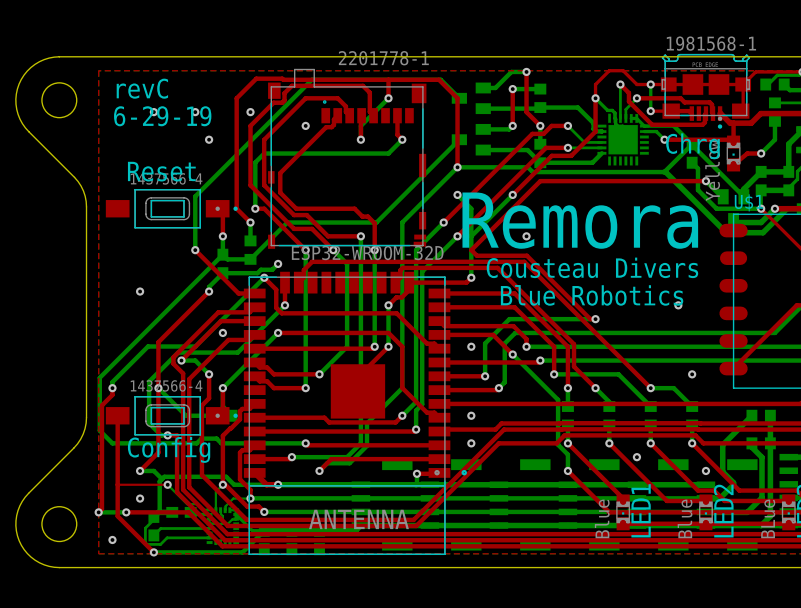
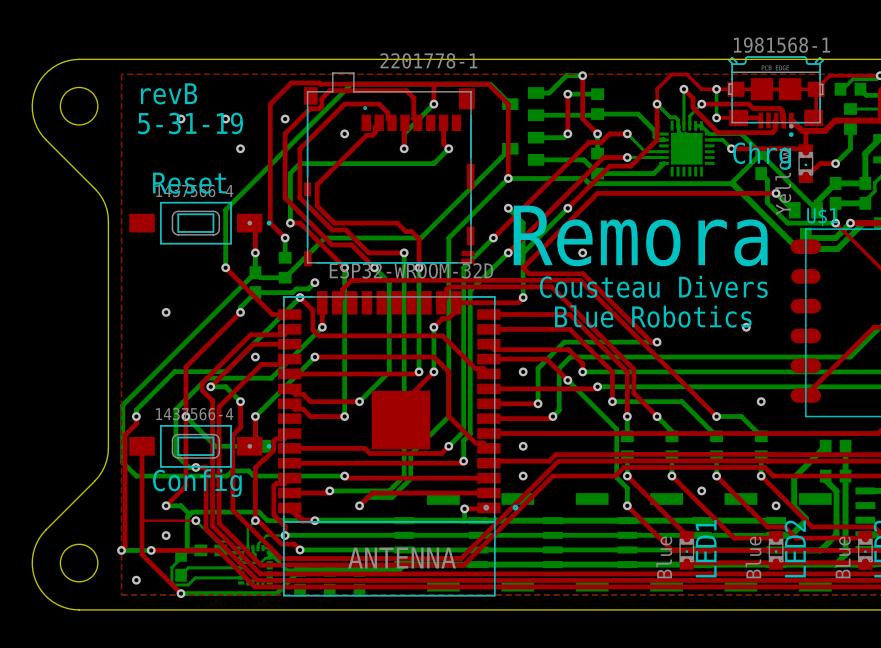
text: revC (142, 88) -> revB (169, 93)
text: 6-29-19 (162, 116) -> 5-31-19 (190, 123)

